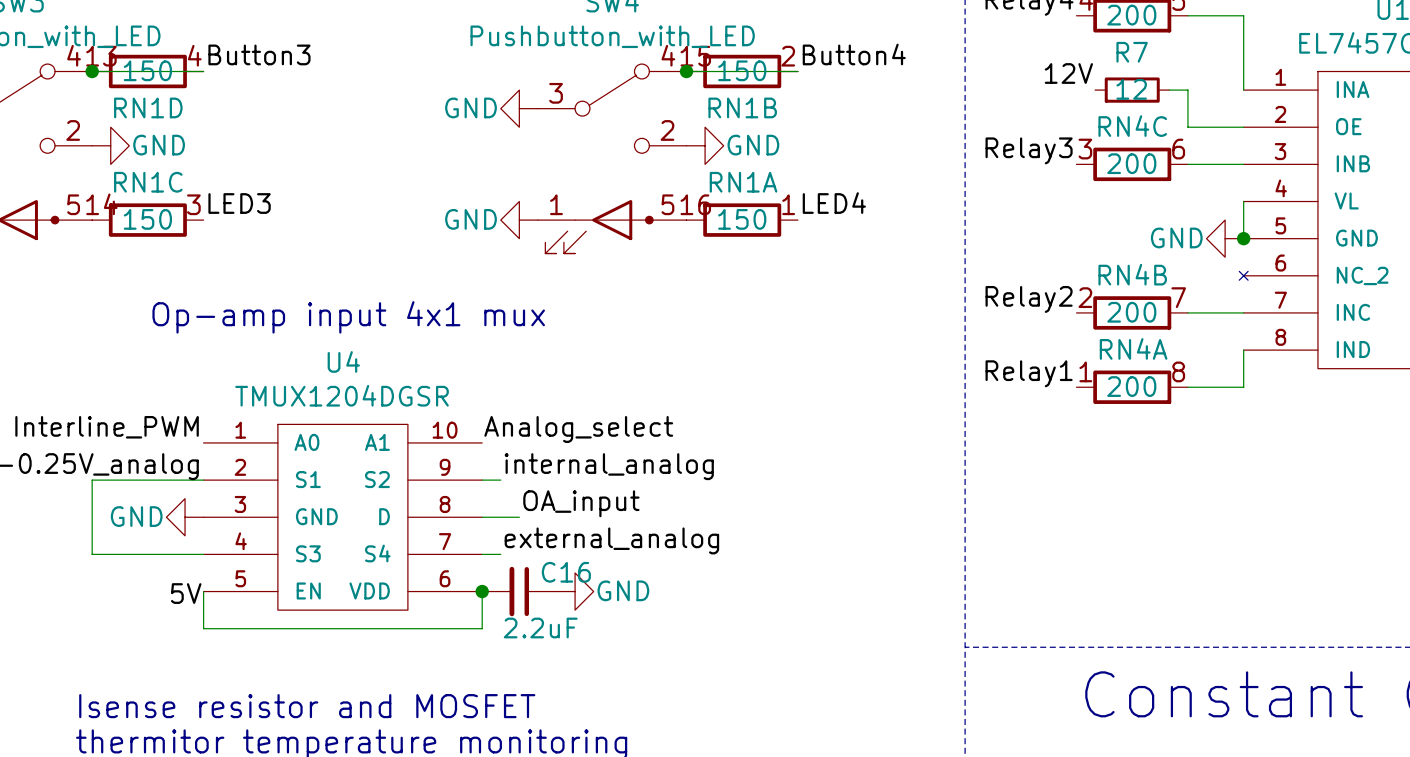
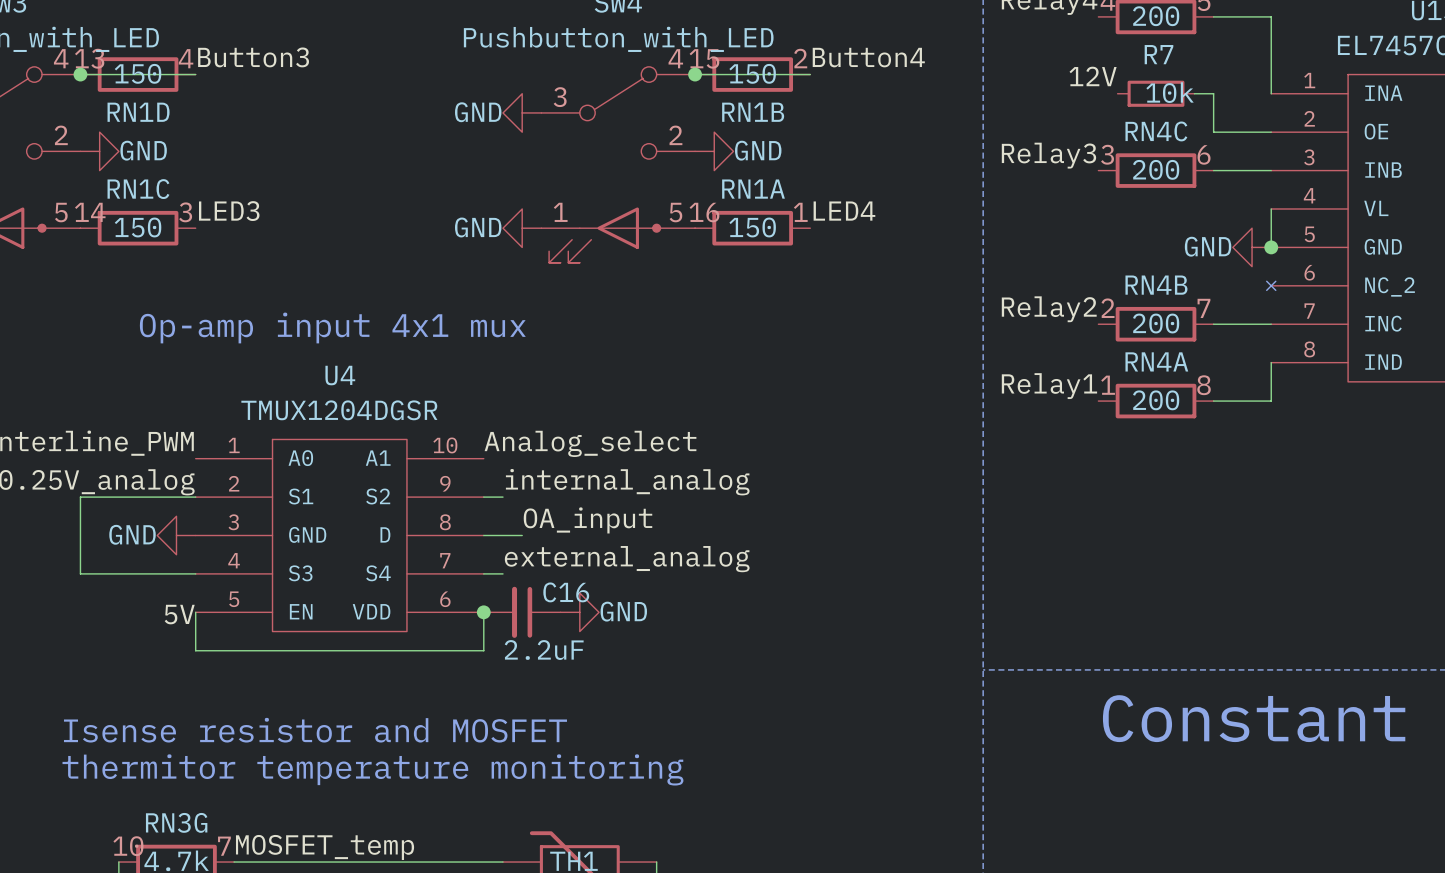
R7 value: 12 (1131, 89) -> 10k (1170, 92)

